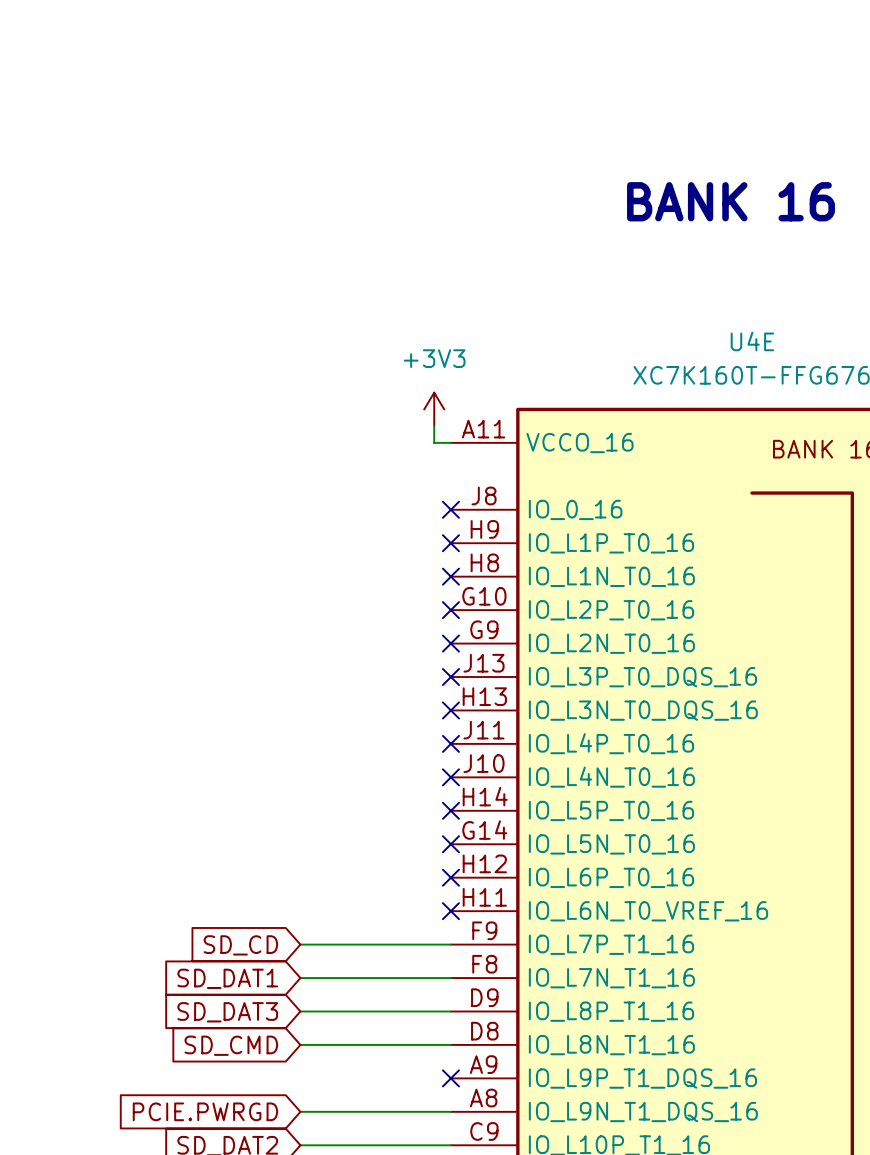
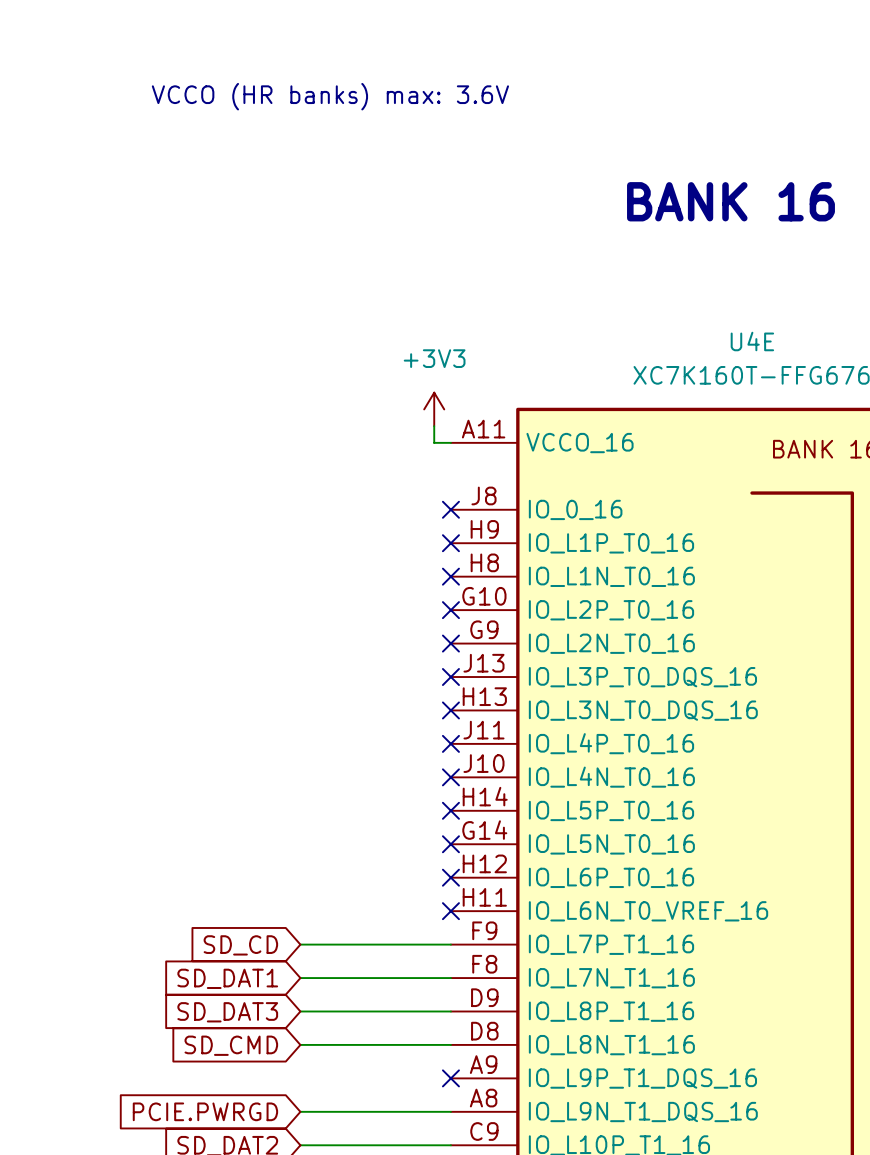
text: none -> VCCO (HR banks) max: 3.6V (330, 96)

